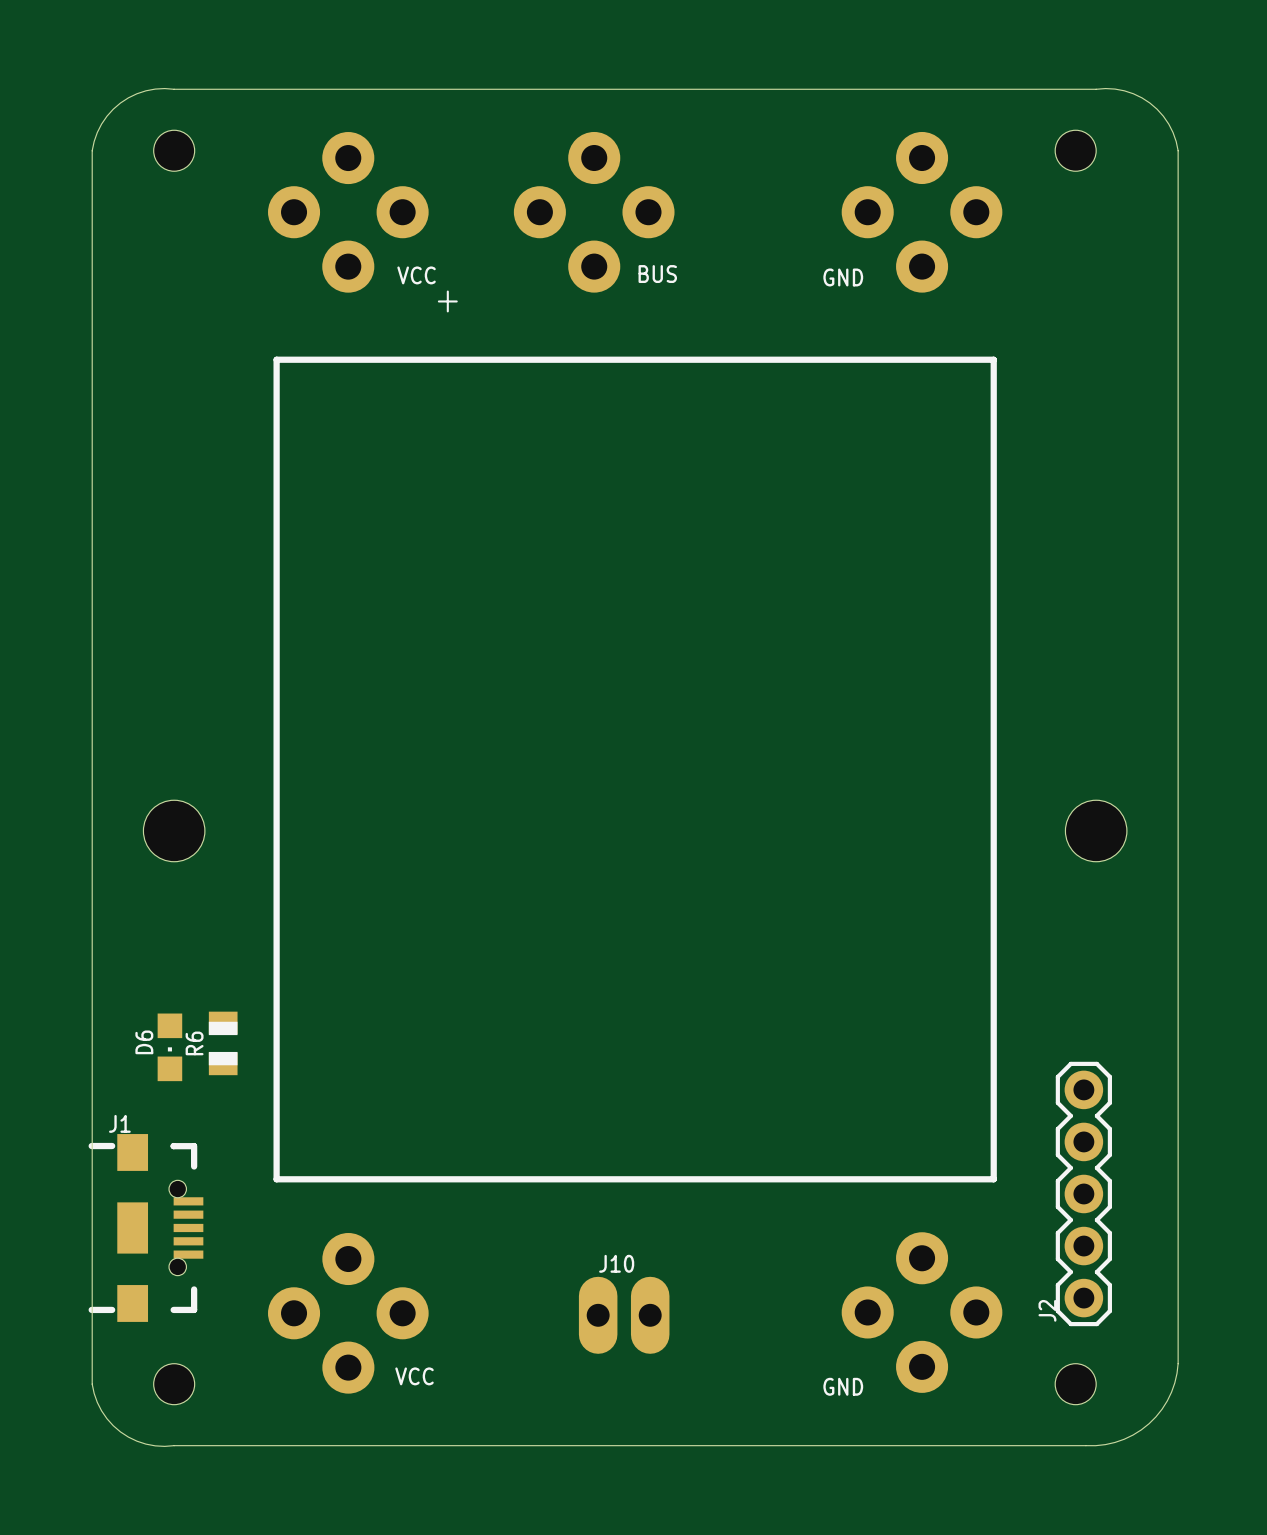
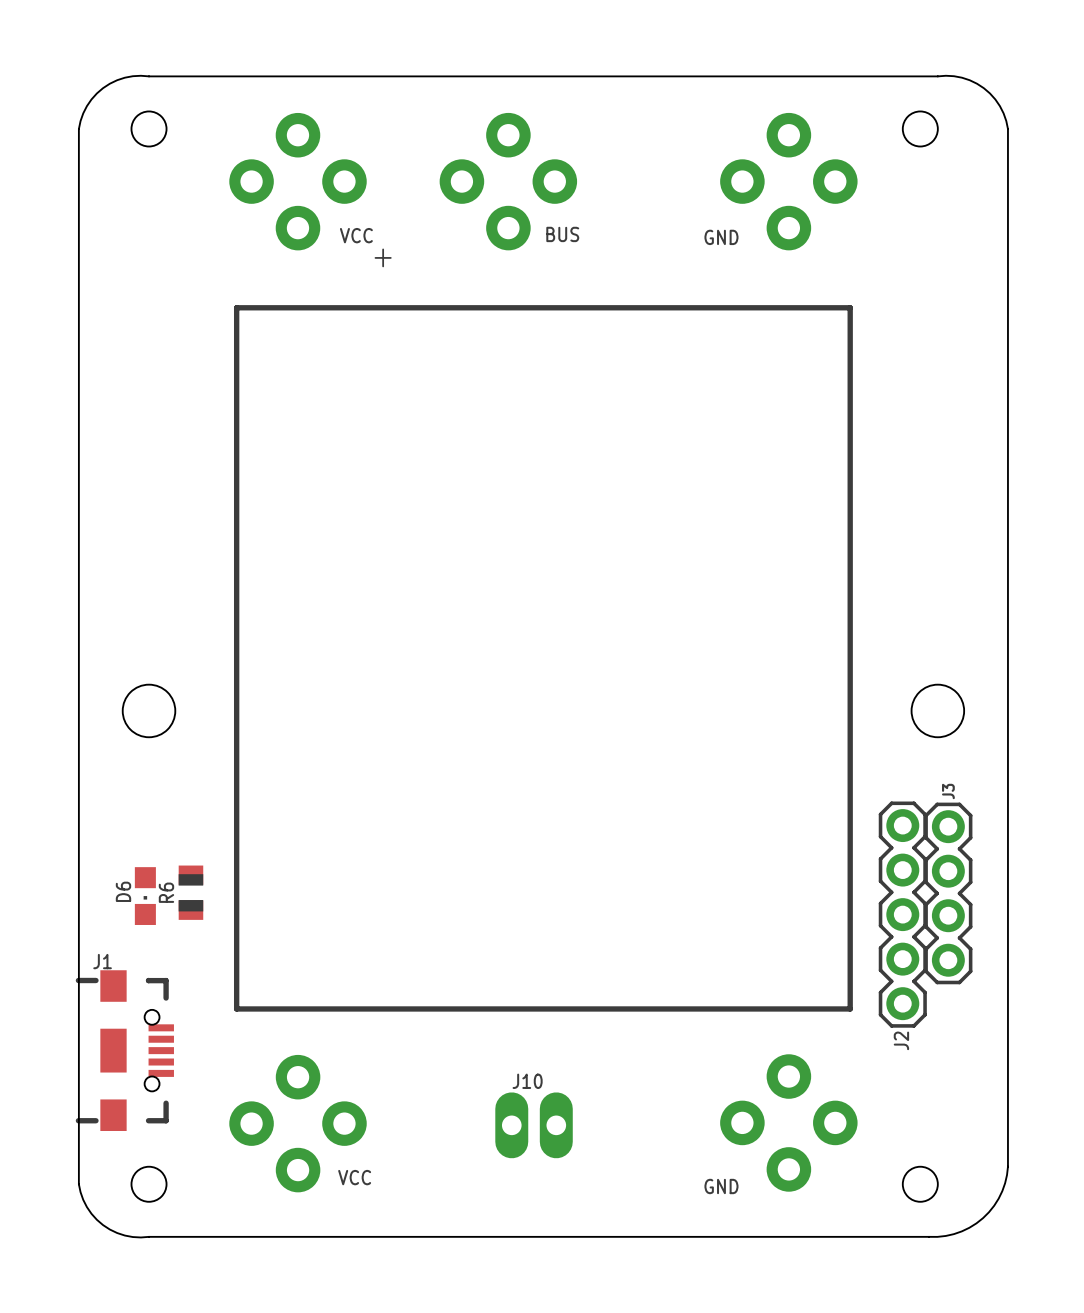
J3: none -> (948, 893)
J2 position: (1083, 1193) -> (902, 914)
J2 name position: J2 (1047, 1310) -> J2 (901, 1040)

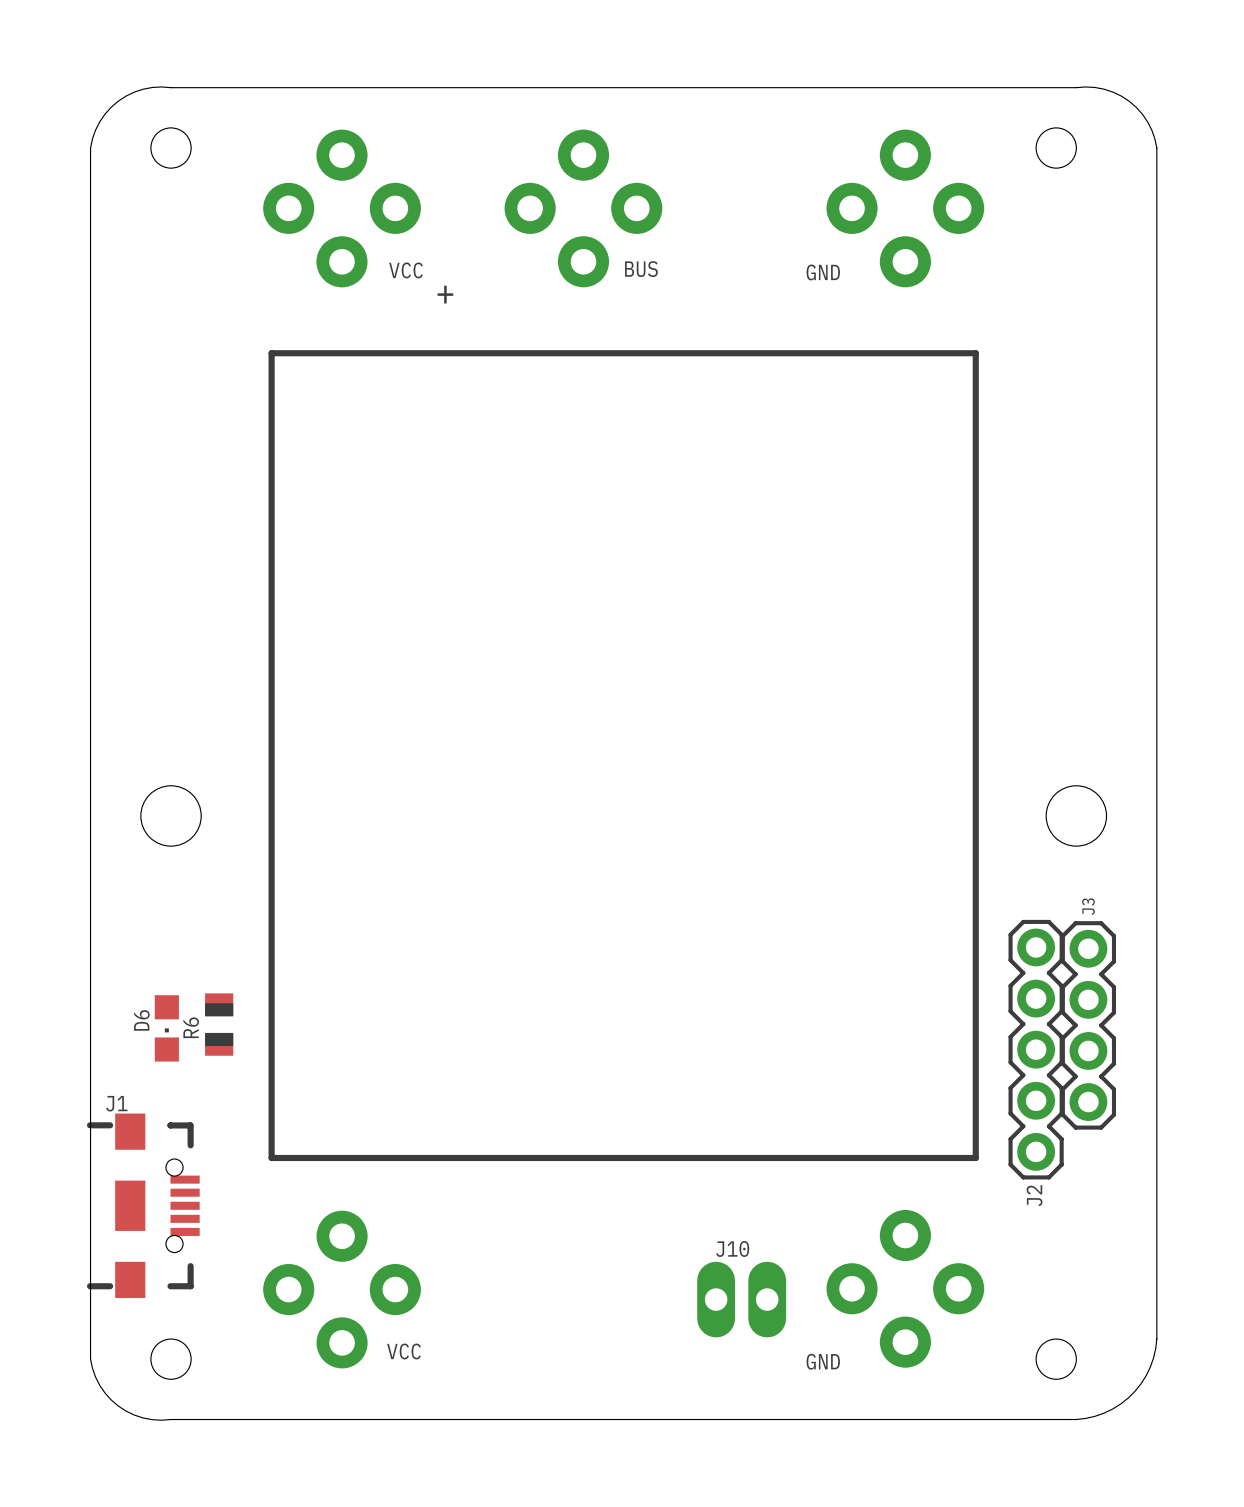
J10 position: (534, 1125) -> (741, 1299)

